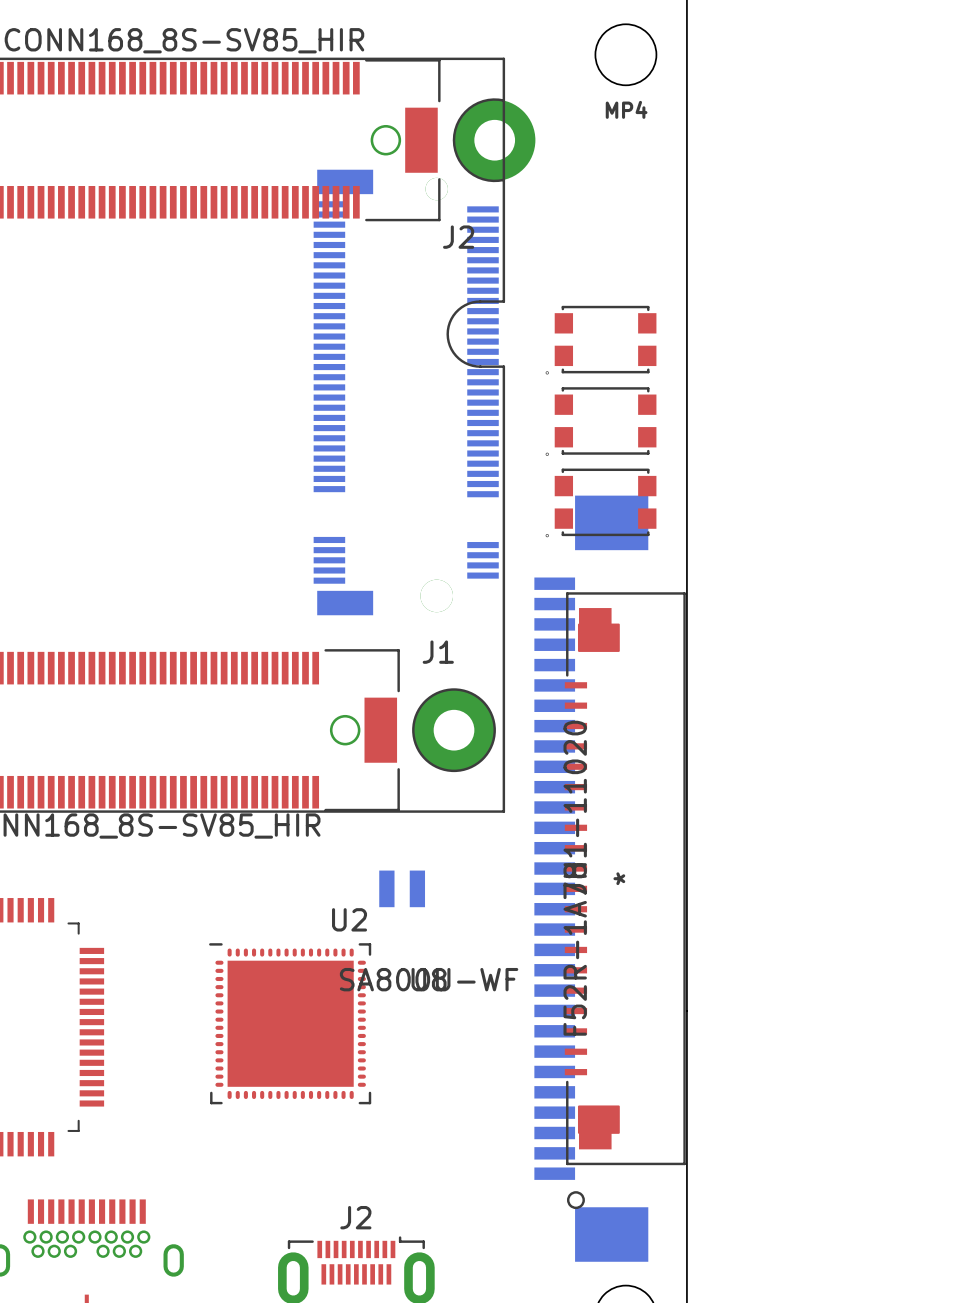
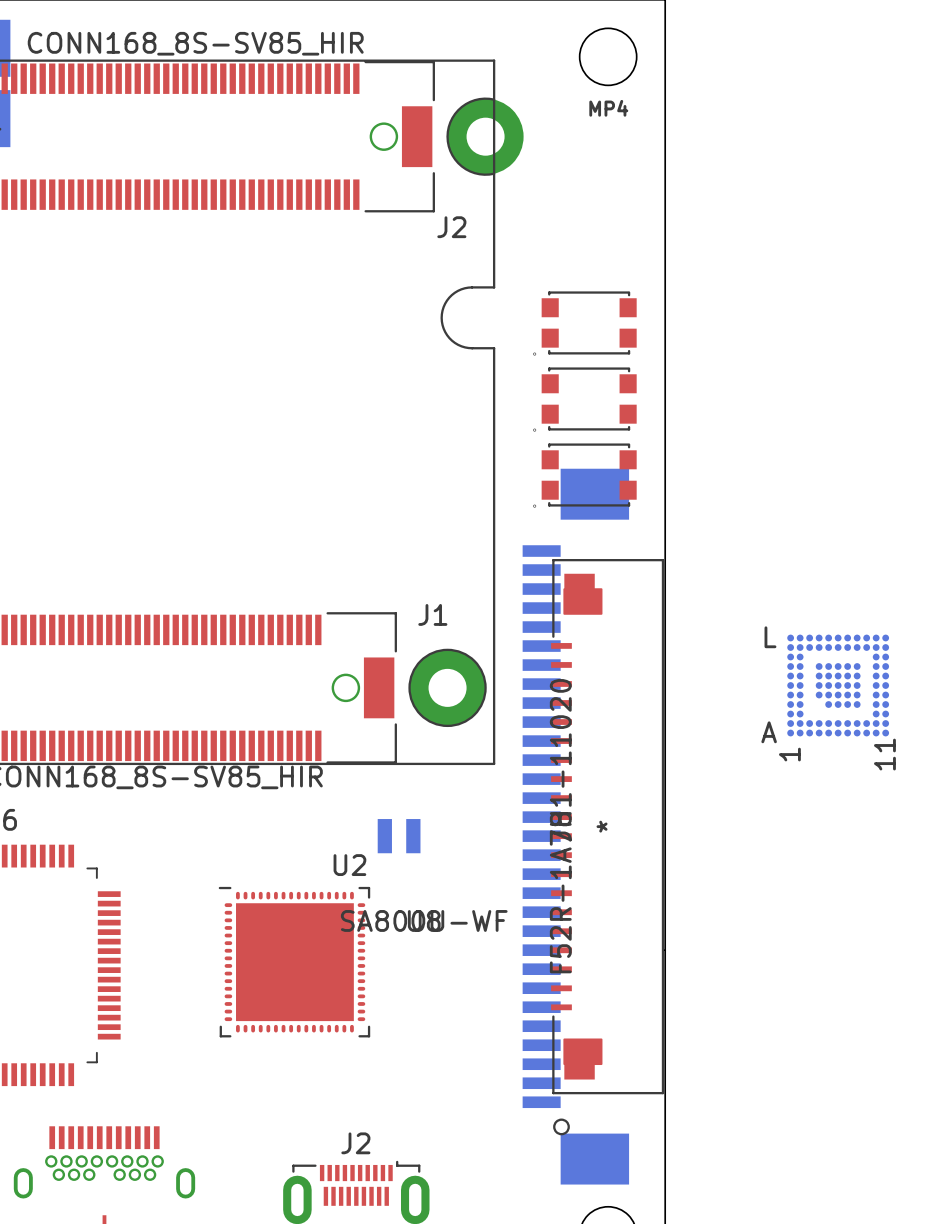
part: (406, 392) -> none
part: none -> (838, 685)

